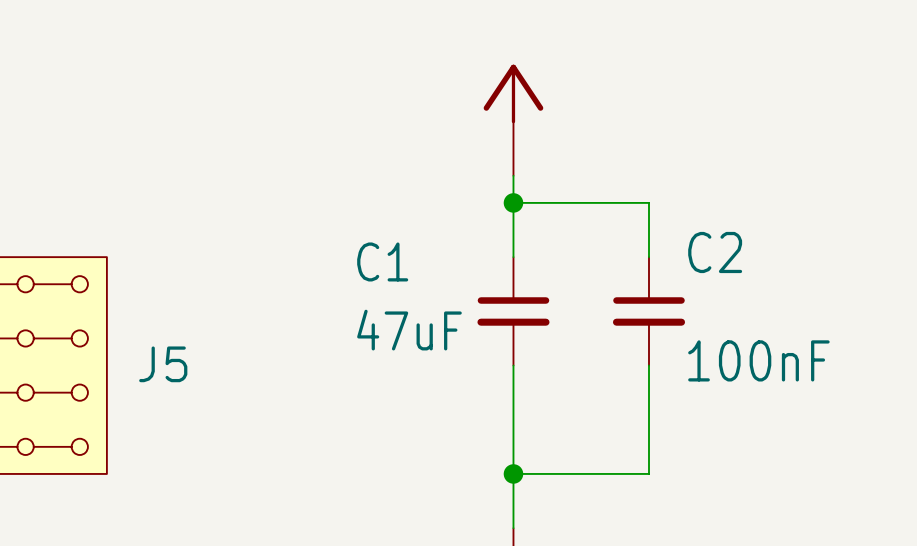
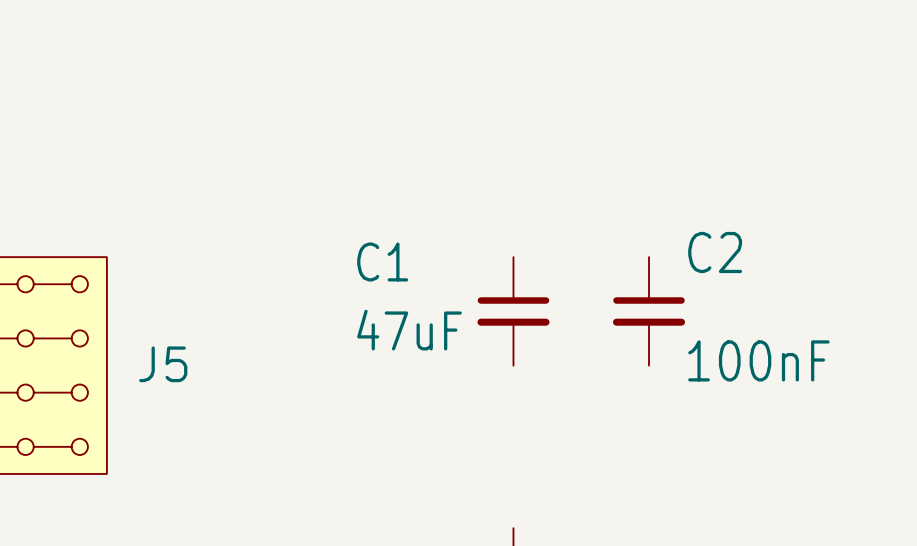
power symbol: (513, 120) -> none
wire: (513, 175) (513, 257) -> none
wire: (513, 202) (648, 202) (648, 257) -> none
junction: (513, 202) -> none
wire: (513, 365) (513, 528) -> none
wire: (648, 365) (648, 473) (513, 473) -> none
junction: (513, 473) -> none

